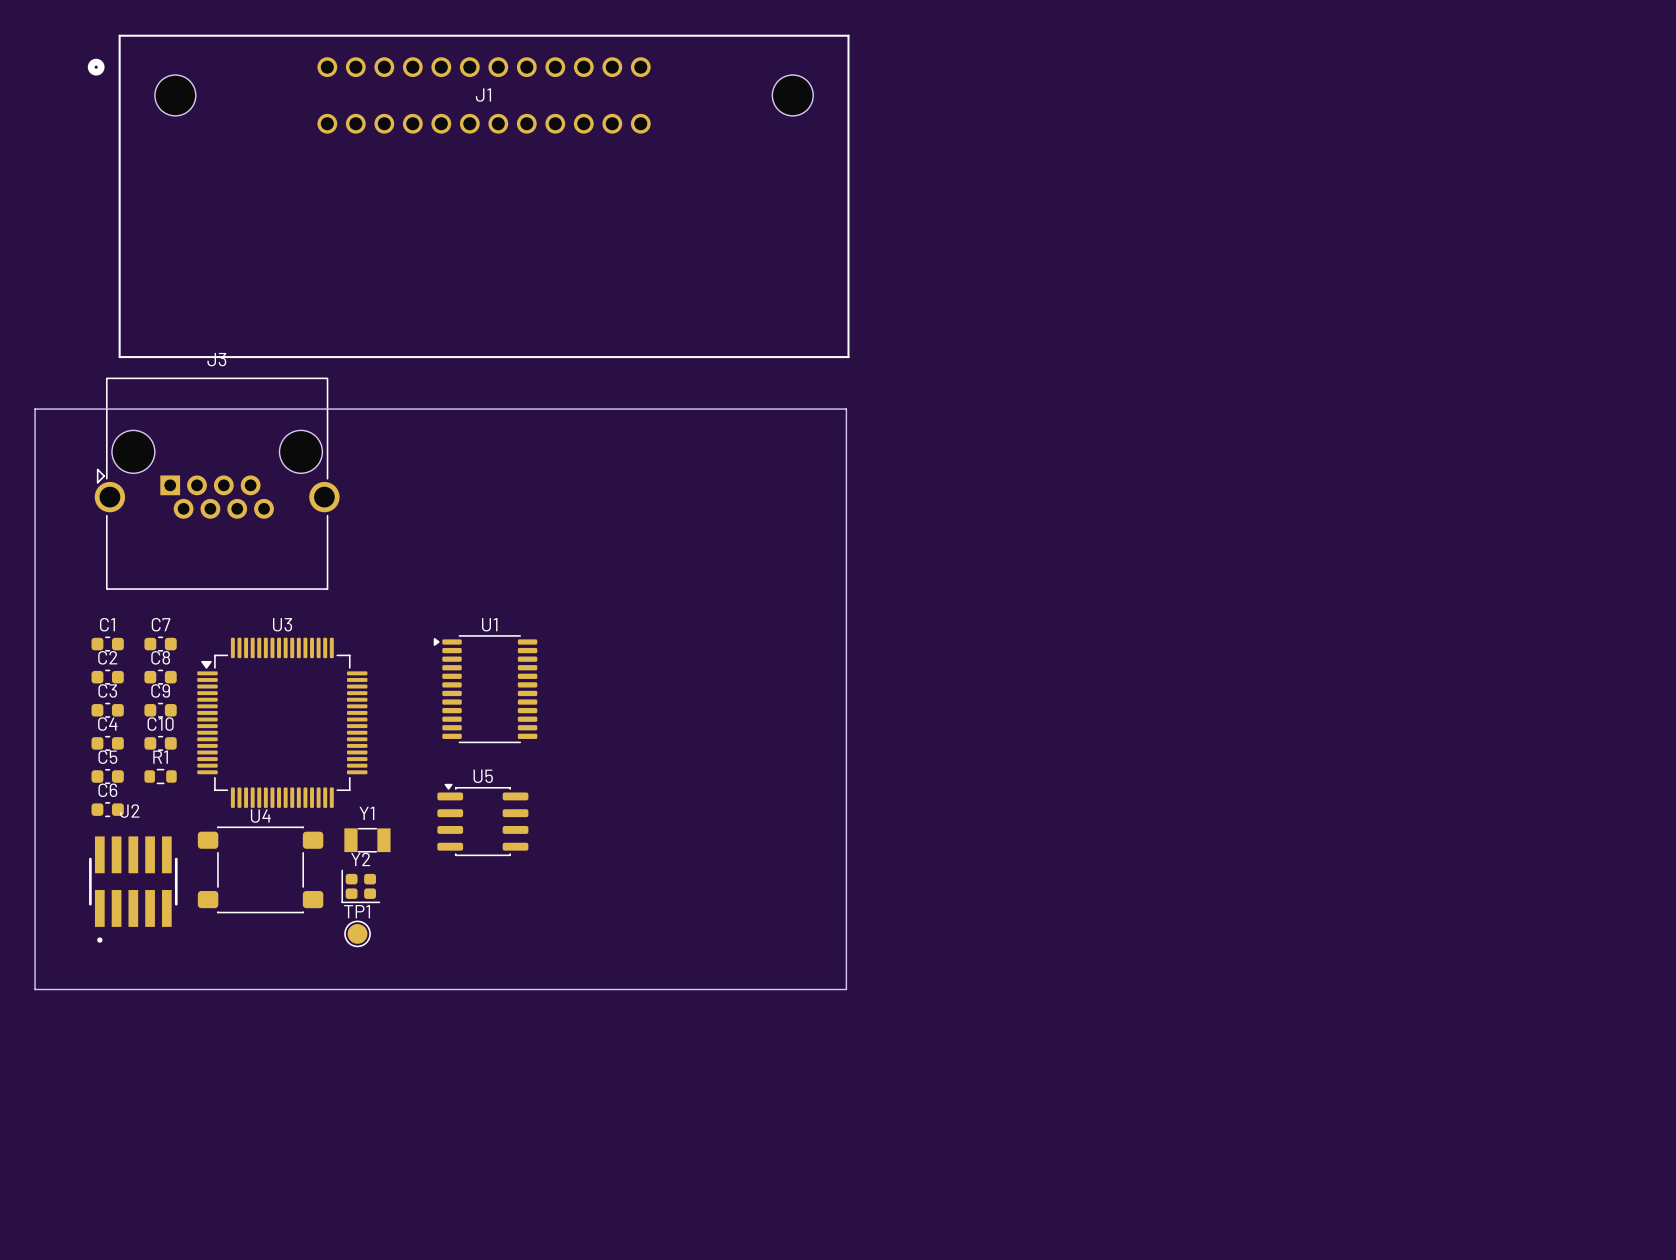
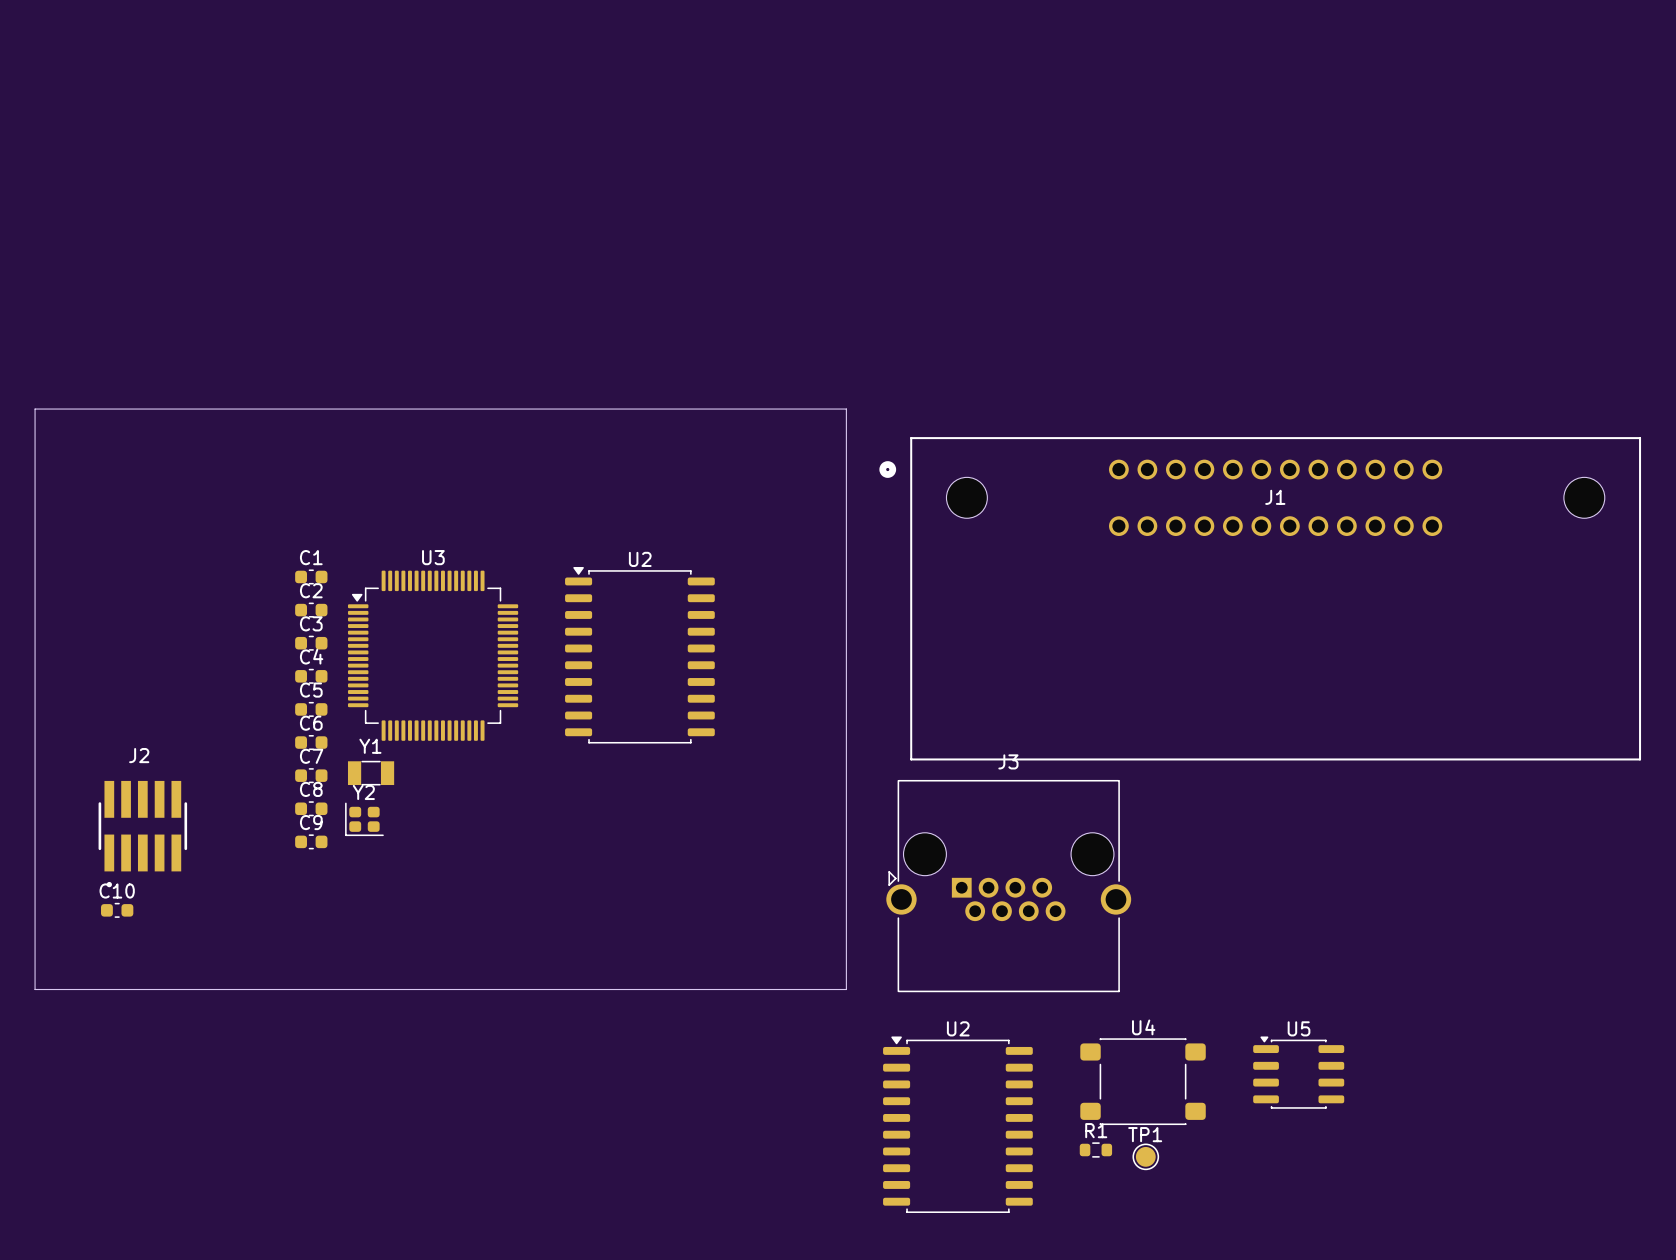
J1 position: (468, 196) -> (1260, 598)
J3 position: (217, 483) -> (1008, 886)
C1 position: (107, 644) -> (311, 576)
C7 position: (160, 644) -> (311, 775)
U2: none -> (639, 655)
C2 position: (107, 677) -> (311, 610)
C8 position: (160, 677) -> (311, 808)
U1: (485, 689) -> none
C3 position: (107, 710) -> (311, 643)
C9 position: (160, 710) -> (311, 841)
U3 position: (282, 722) -> (433, 655)
C4 position: (107, 743) -> (311, 676)
C10 position: (160, 743) -> (117, 910)
C5 position: (107, 776) -> (311, 709)
R1 position: (160, 776) -> (1095, 1149)
C6 position: (107, 809) -> (311, 742)
U5 position: (482, 819) -> (1298, 1072)
Y1 position: (367, 840) -> (371, 773)
U4 position: (260, 869) -> (1143, 1081)
Y2 position: (360, 886) -> (364, 819)
J2 position: (133, 889) -> (142, 834)
TP1 position: (357, 933) -> (1145, 1156)
U2: none -> (957, 1124)

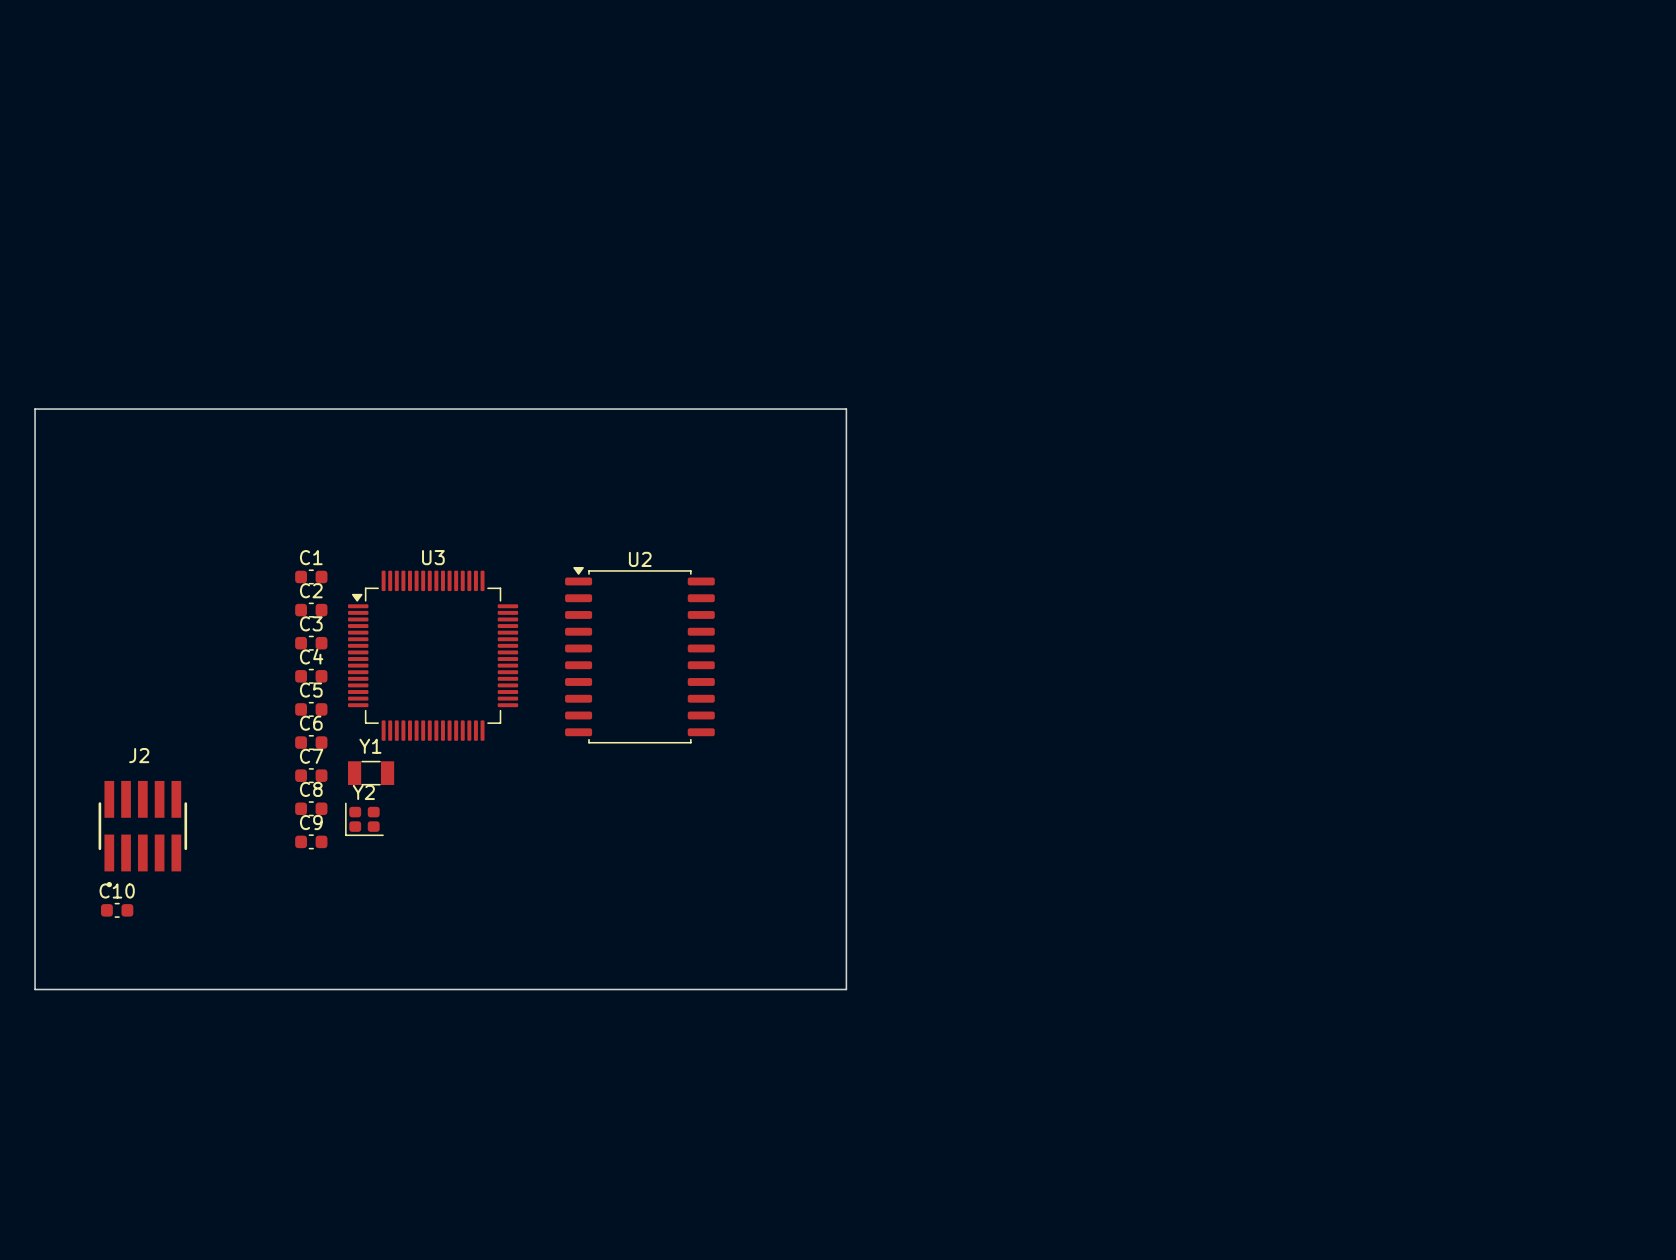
J1: (1260, 598) -> none
J3: (1008, 886) -> none
U5: (1298, 1072) -> none
U4: (1143, 1081) -> none
U2: (957, 1124) -> none
R1: (1095, 1149) -> none
TP1: (1145, 1156) -> none

